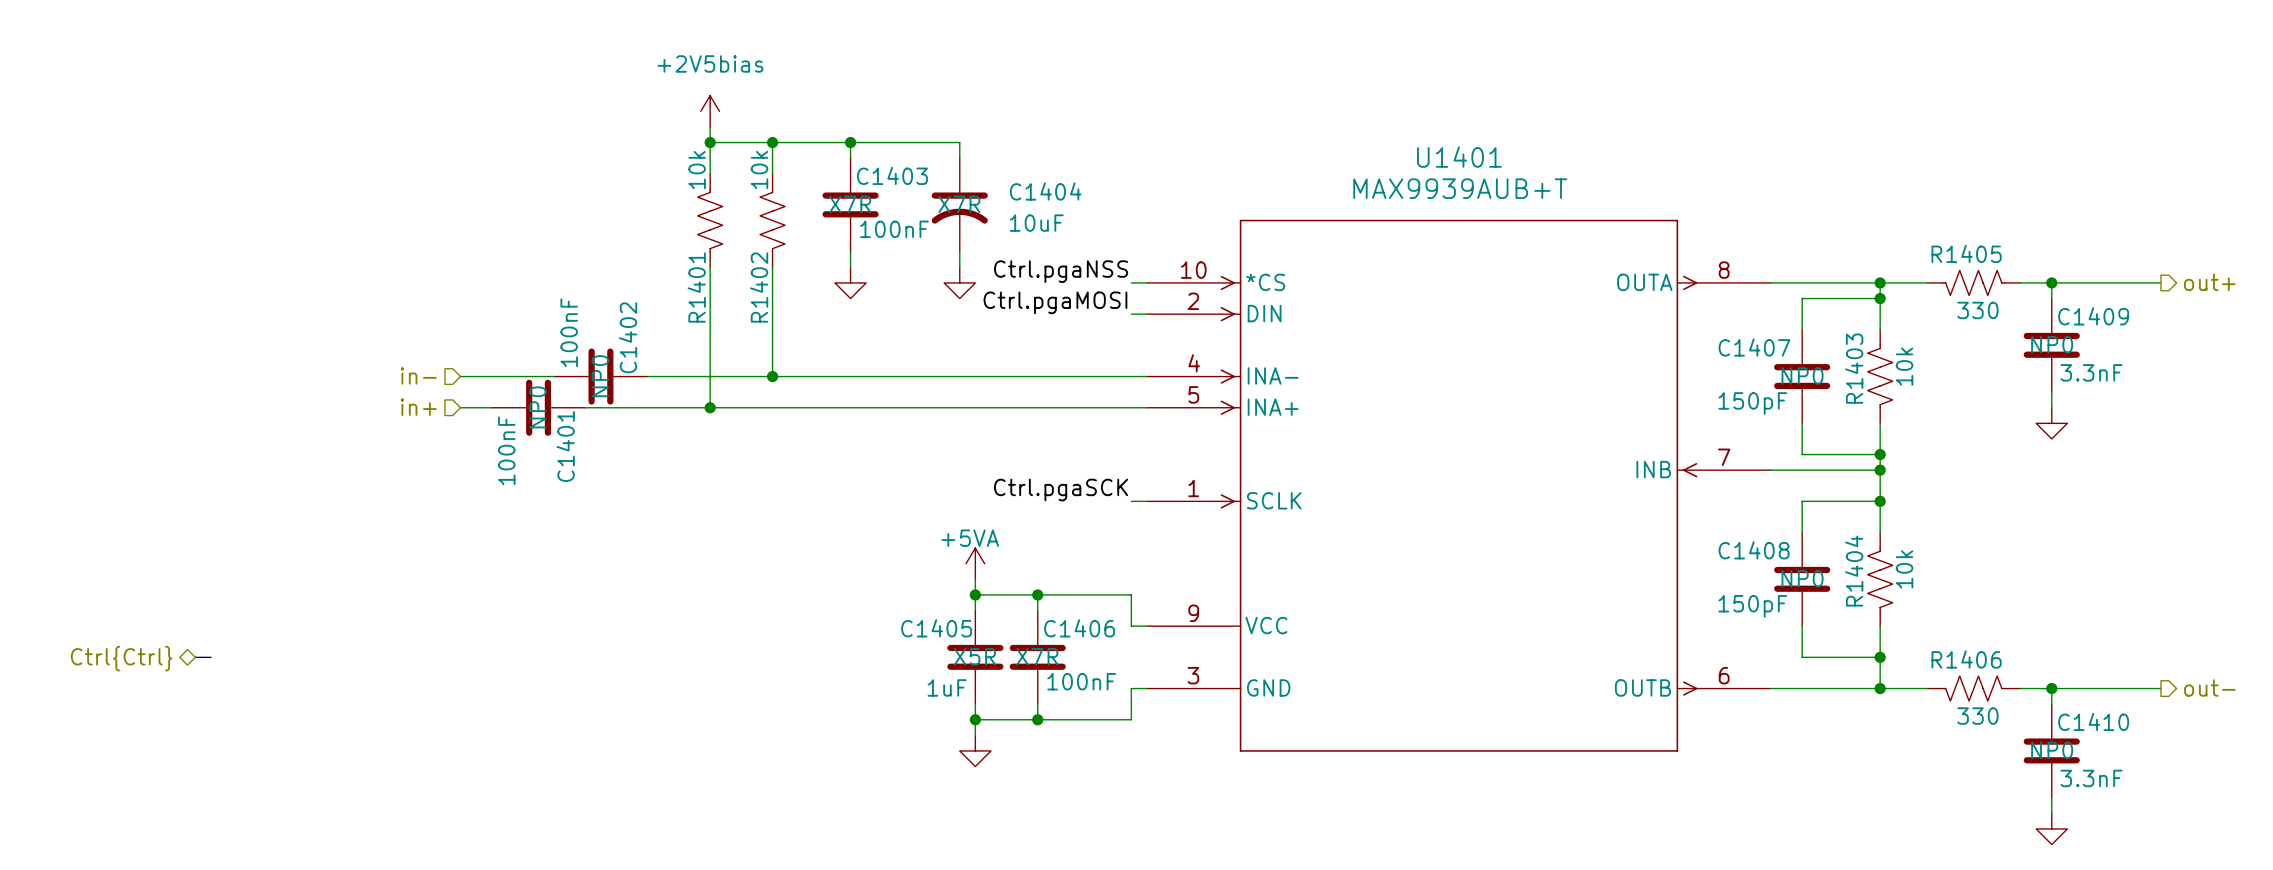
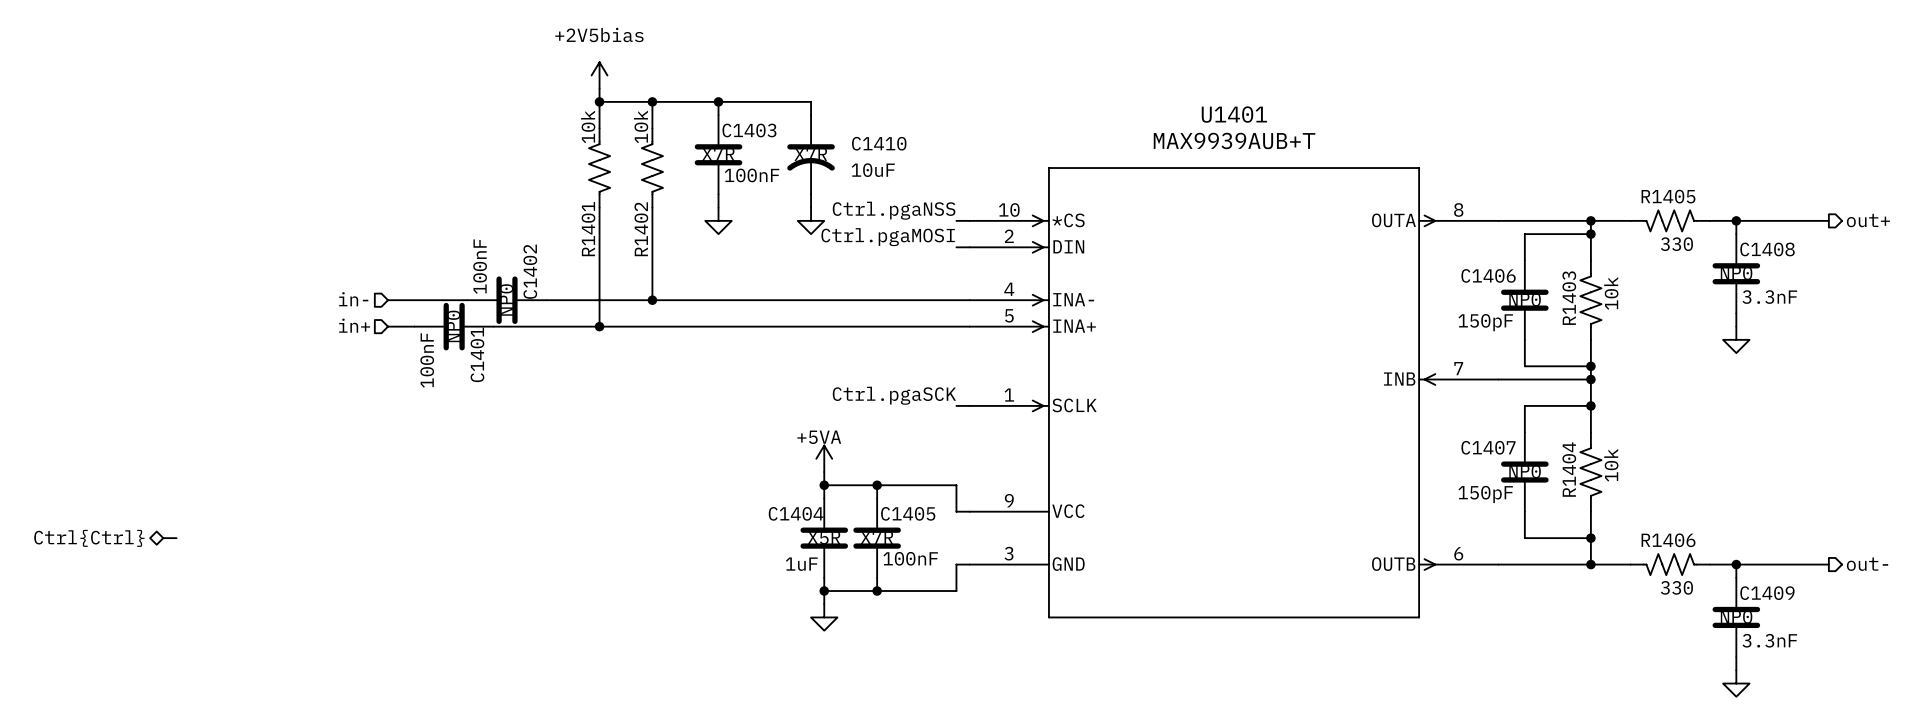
C1404 name: C1404 (1045, 191) -> C1410 (879, 143)
C1409 name: C1409 (2093, 316) -> C1408 (1767, 249)
C1407 name: C1407 (1754, 347) -> C1406 (1488, 275)
C1408 name: C1408 (1754, 550) -> C1407 (1488, 447)
C1405 name: C1405 (936, 628) -> C1404 (796, 513)
C1406 name: C1406 (1079, 628) -> C1405 (908, 513)
C1410 name: C1410 (2093, 721) -> C1409 (1767, 593)

